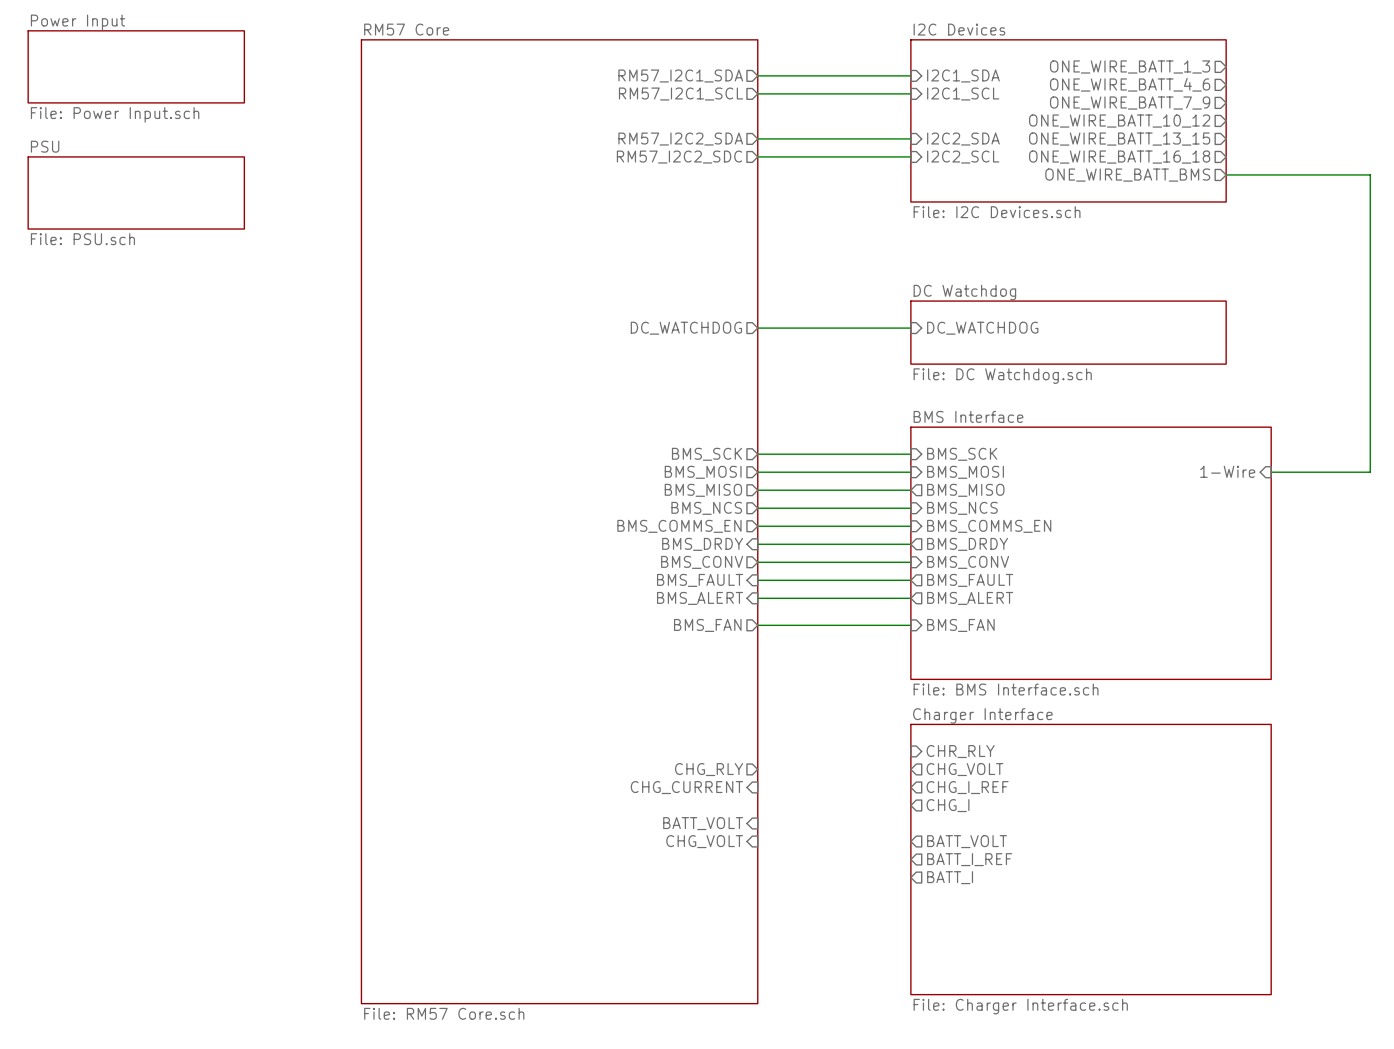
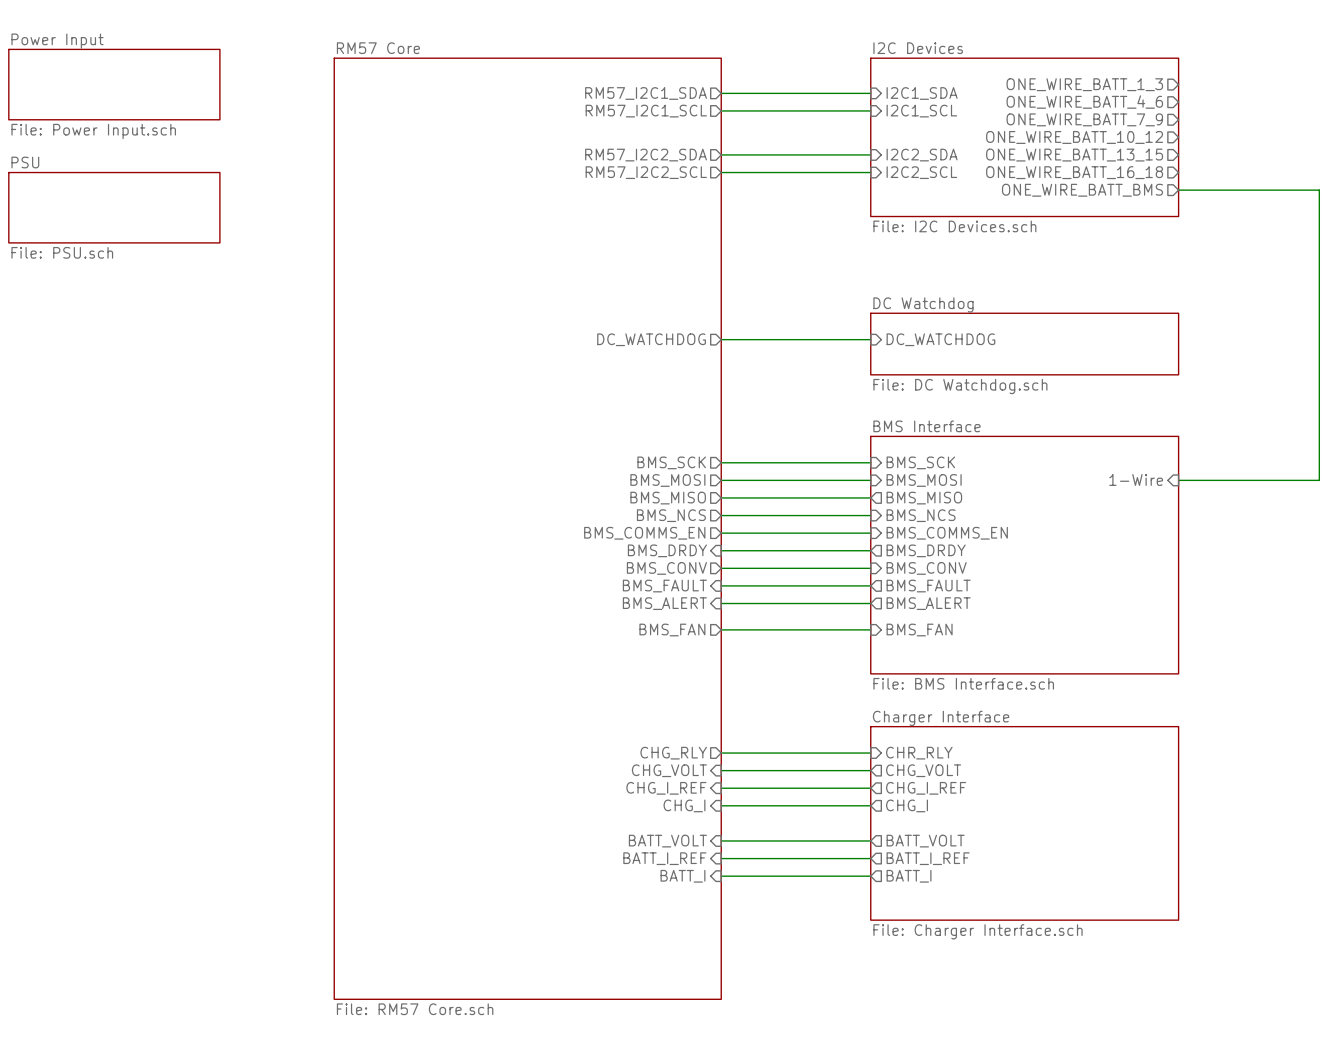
sheet pin: RM57_I2C2_SDC (679, 157) -> RM57_I2C2_SCL (646, 172)
sheet pin position: 1-Wire (1227, 471) -> 1-Wire (1136, 479)
wire: none -> (1178, 480) (1222, 480)
sheet BMS Interface: none -> File: BMS Interface.sch (1024, 555)
sheet BMS Interface: File: BMS Interface.sch (1091, 553) -> none
sheet pin: none -> CHG_RLY (673, 753)
wire: none -> (721, 753) (870, 753)
sheet pin shape: output (709, 769) -> input (669, 770)
sheet pin: CHG_RLY (709, 769) -> CHG_VOLT (669, 770)
wire: none -> (721, 770) (870, 770)
sheet pin: CHG_CURRENT (686, 787) -> CHG_I_REF (666, 788)
wire: none -> (721, 788) (870, 788)
sheet pin: none -> CHG_I (684, 805)
wire: none -> (721, 805) (870, 805)
sheet pin: BATT_VOLT (703, 823) -> none
sheet Charger Interface: none -> File: Charger Interface.sch (1024, 823)
sheet pin: CHG_VOLT (704, 841) -> BATT_VOLT (667, 841)
wire: none -> (721, 840) (870, 840)
sheet pin: none -> BATT_I_REF (664, 858)
wire: none -> (721, 858) (870, 858)
sheet Charger Interface: File: Charger Interface.sch (1091, 859) -> none
sheet pin: none -> BATT_I (682, 876)
wire: none -> (721, 876) (870, 876)

